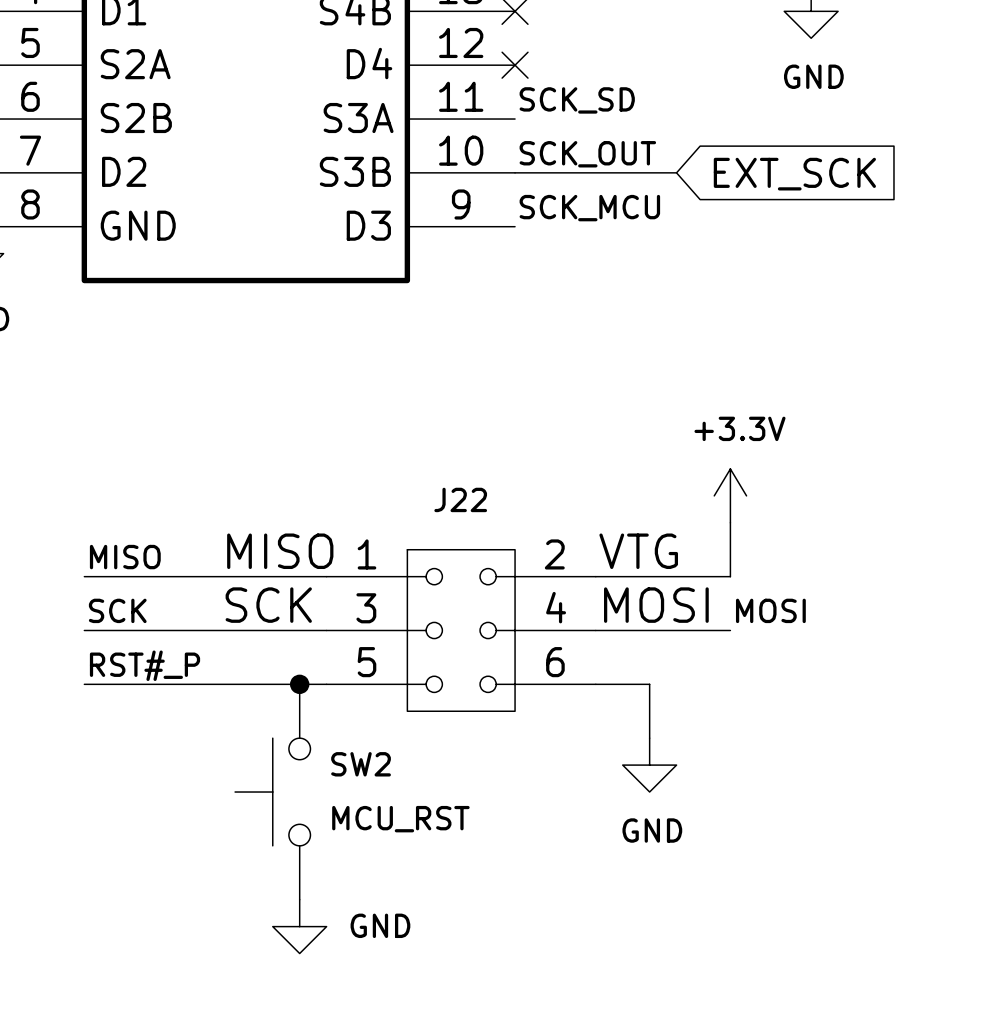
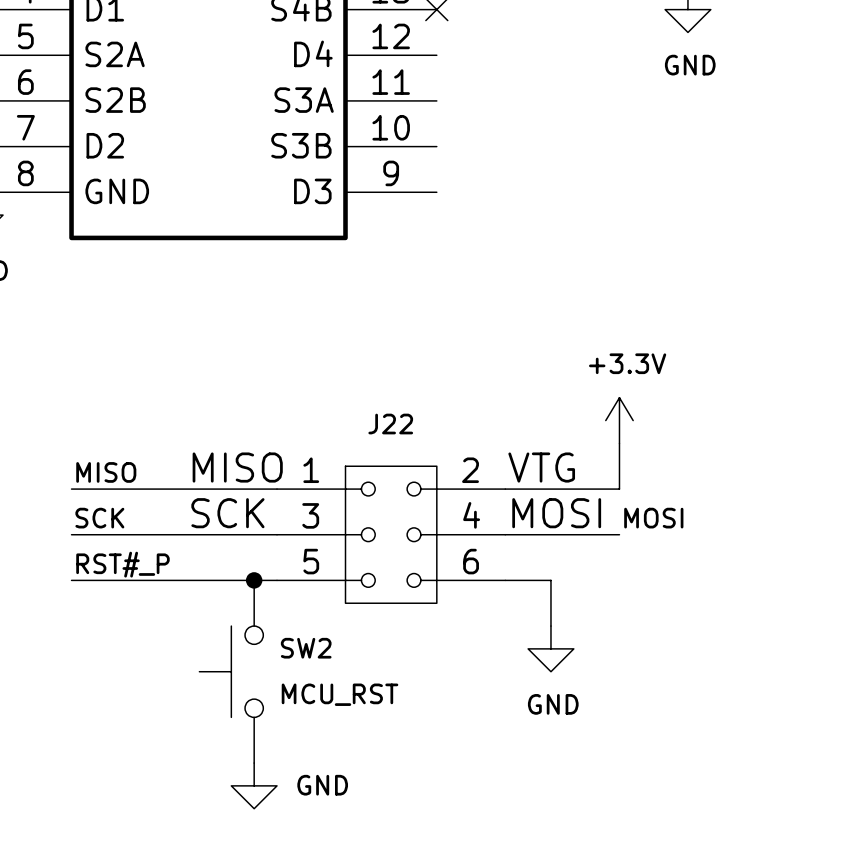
no-connect mark: (515, 65) -> none
label: SCK_SD (577, 100) -> none
label: SCK_OUT (587, 154) -> none
wire: (515, 172) (676, 172) -> none
global label: EXT_SCK (794, 174) -> none
label: SCK_MCU (589, 208) -> none

